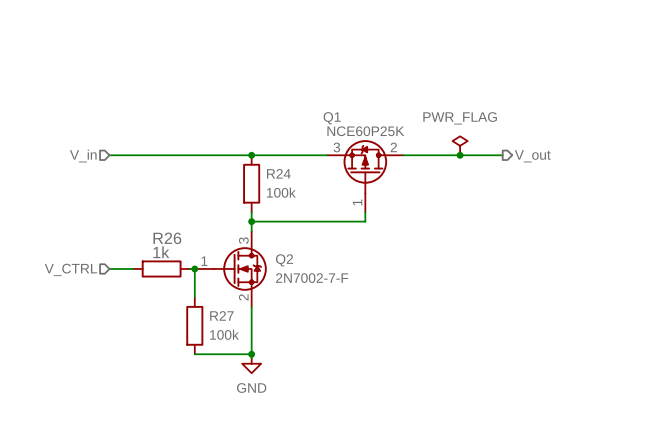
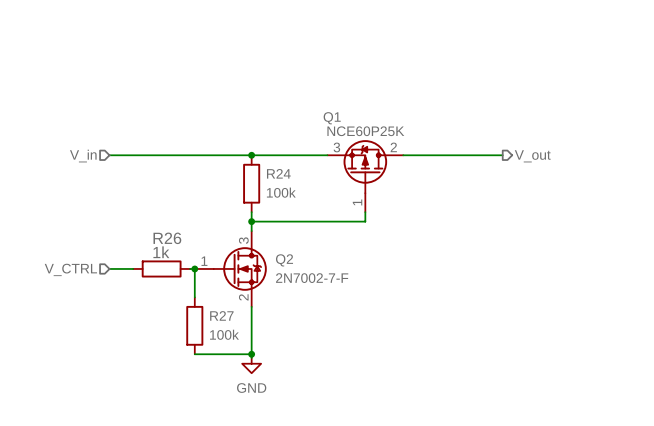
power symbol: PWR_FLAG (460, 145) -> none
junction: (460, 155) -> none

